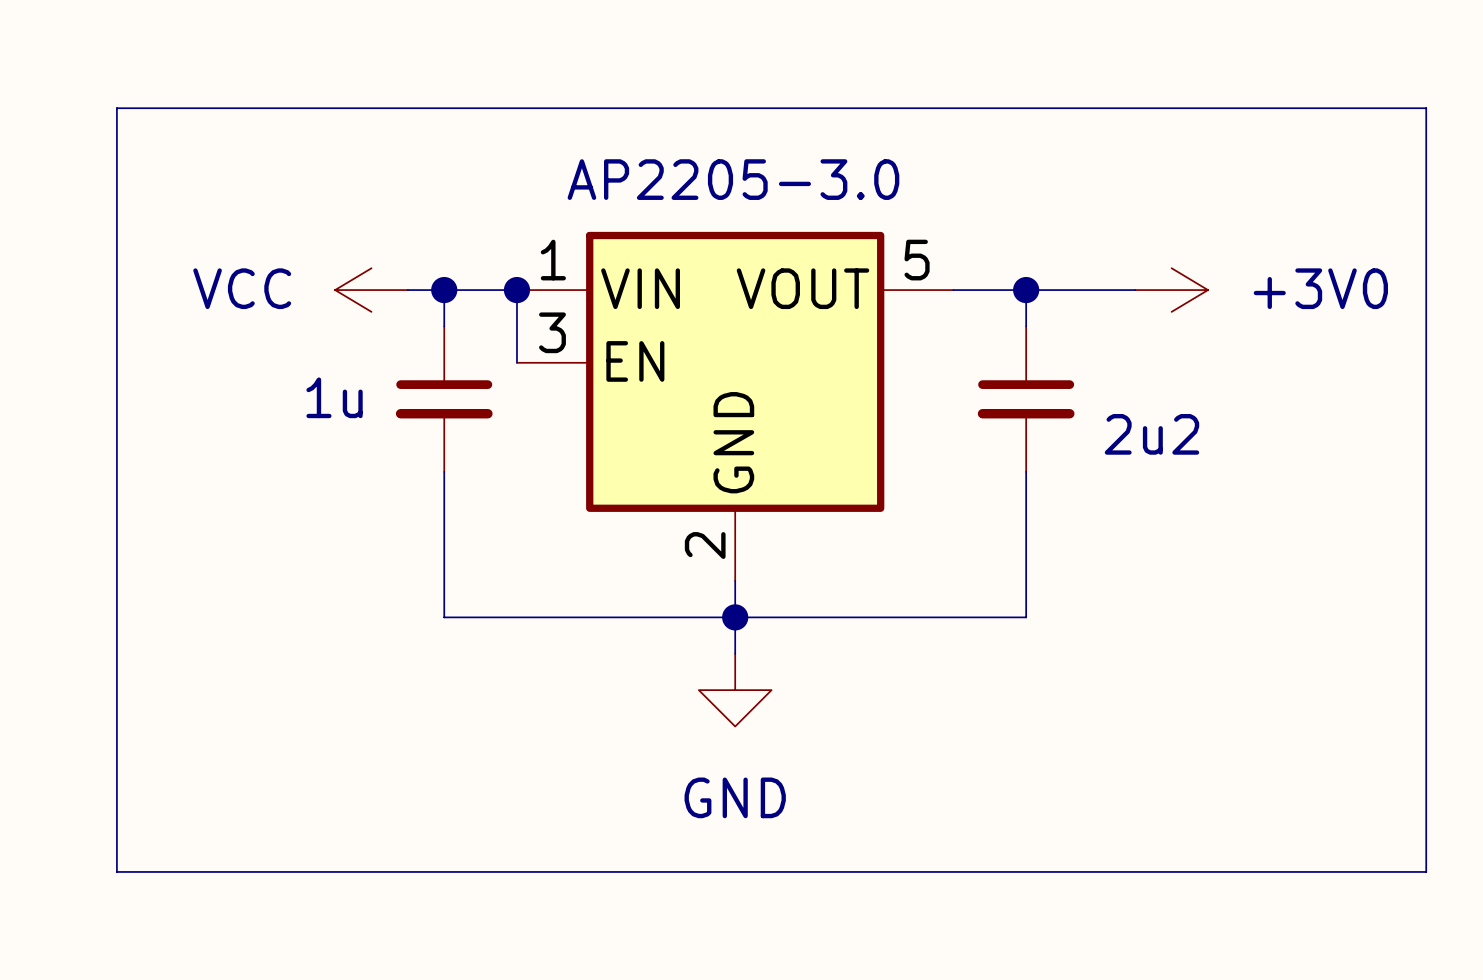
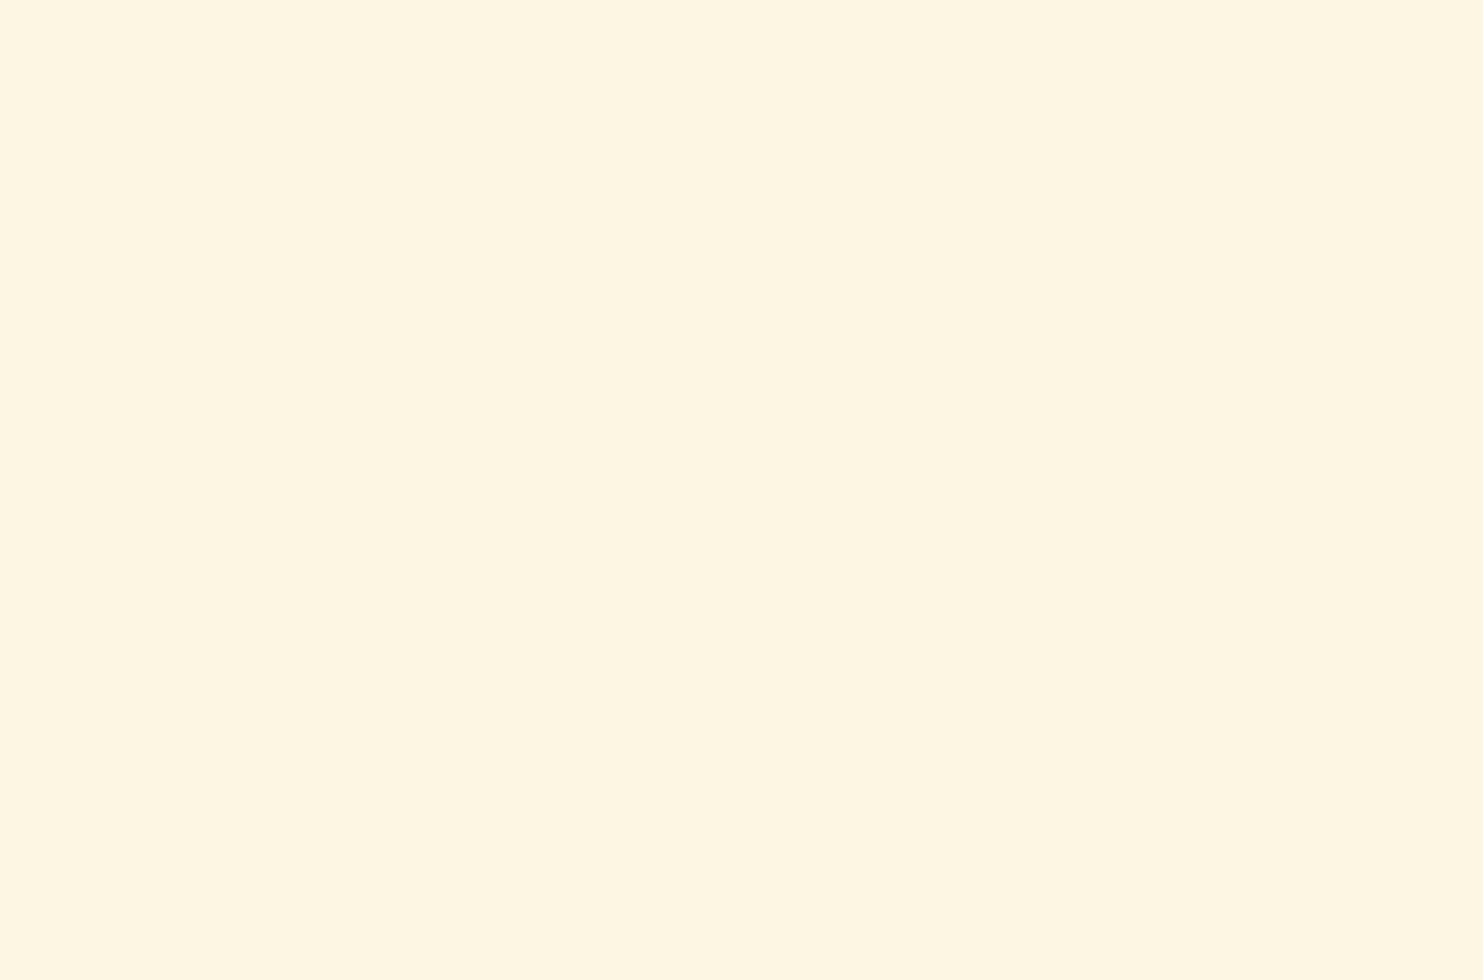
line: (116, 108) (1426, 108) (1426, 871) (116, 871) (116, 108) -> none
power symbol: VCC (371, 290) -> none
wire: (407, 290) (516, 290) (516, 362) -> none
wire: (444, 290) (444, 326) -> none
junction: (444, 290) -> none
junction: (516, 290) -> none
wire: (953, 290) (1135, 290) -> none
wire: (1026, 290) (1026, 326) -> none
junction: (1026, 290) -> none
power symbol: +3V0 (1171, 290) -> none
part: 1u (444, 399) -> none
part: 2u2 (1026, 399) -> none
part: AP2205-3.0 (735, 406) -> none
wire: (444, 471) (444, 617) (1026, 617) (1026, 471) -> none
wire: (735, 581) (735, 653) -> none
junction: (735, 617) -> none
power symbol: GND (735, 690) -> none

